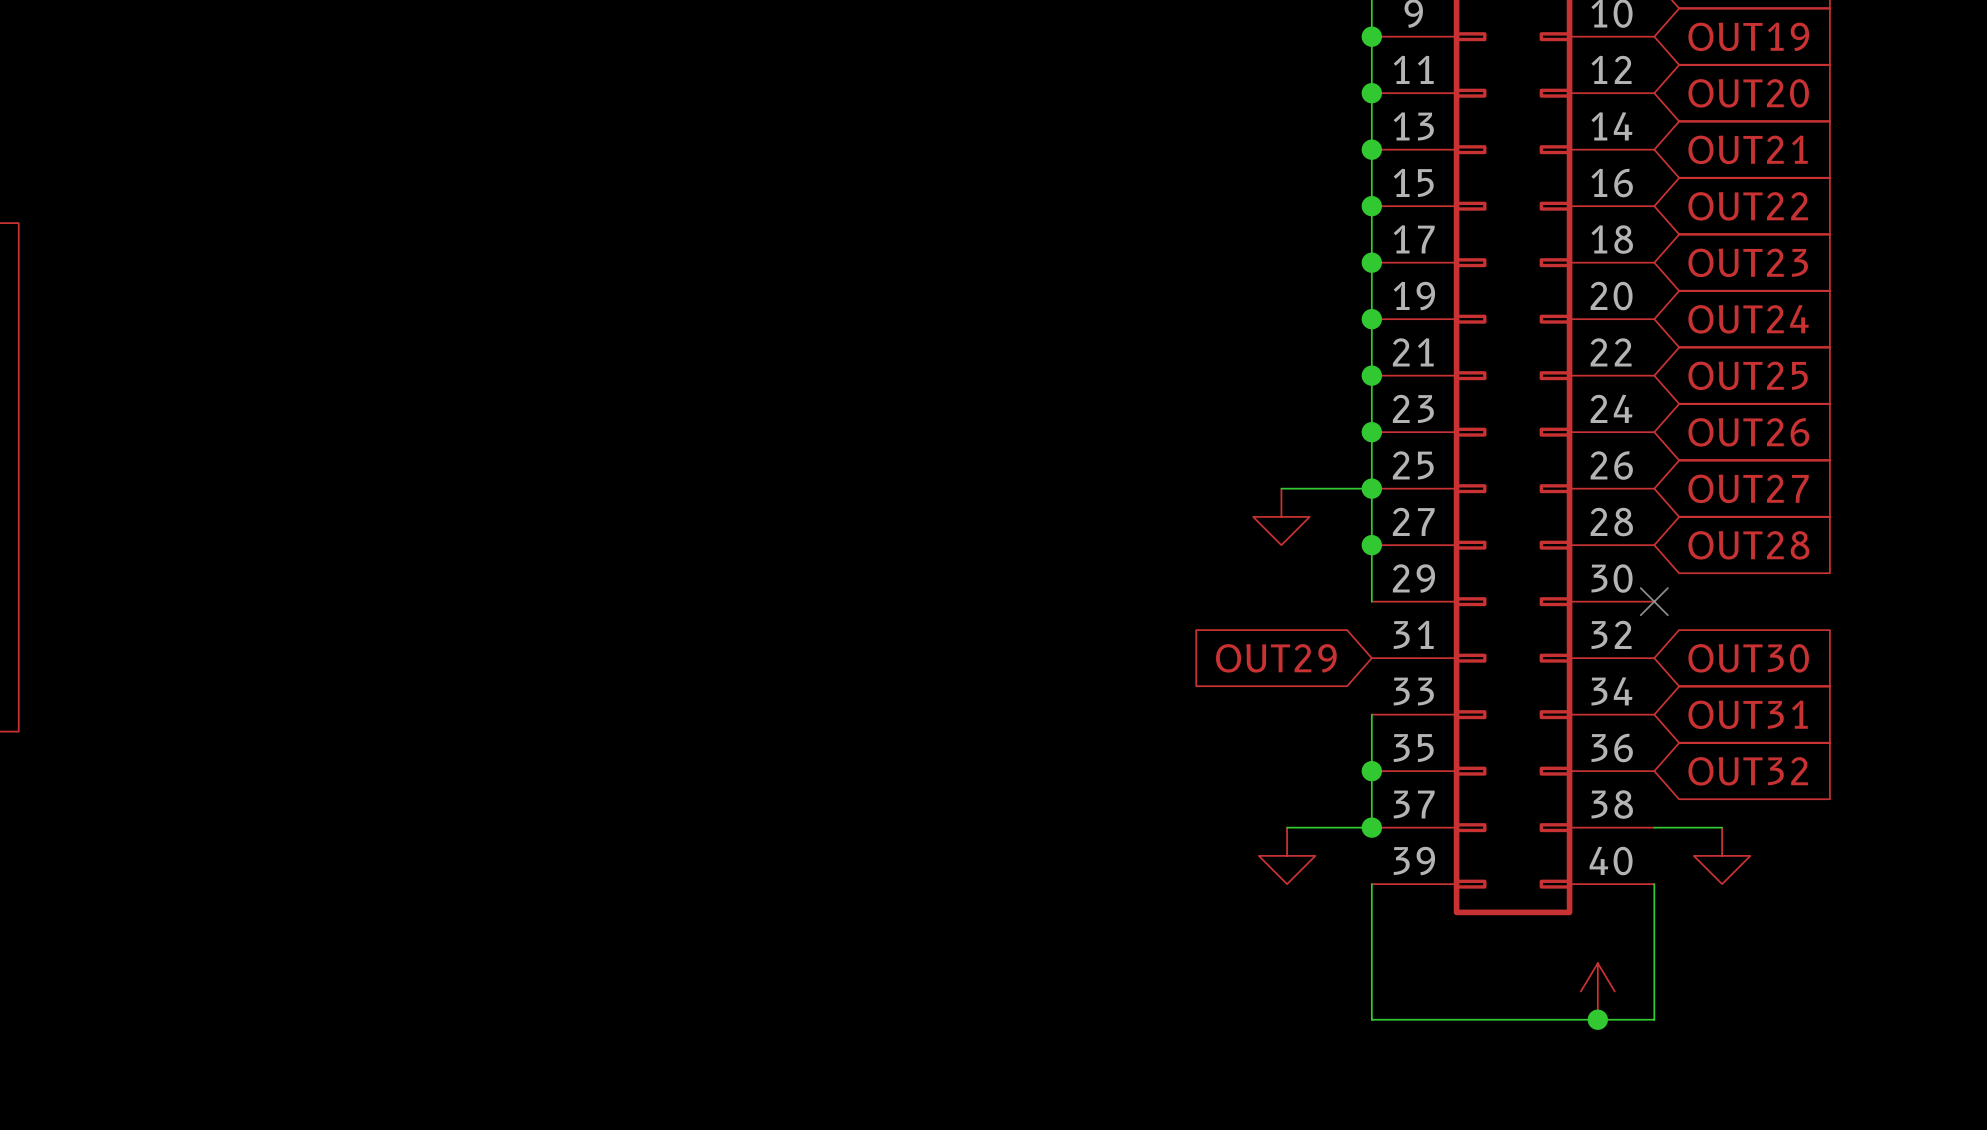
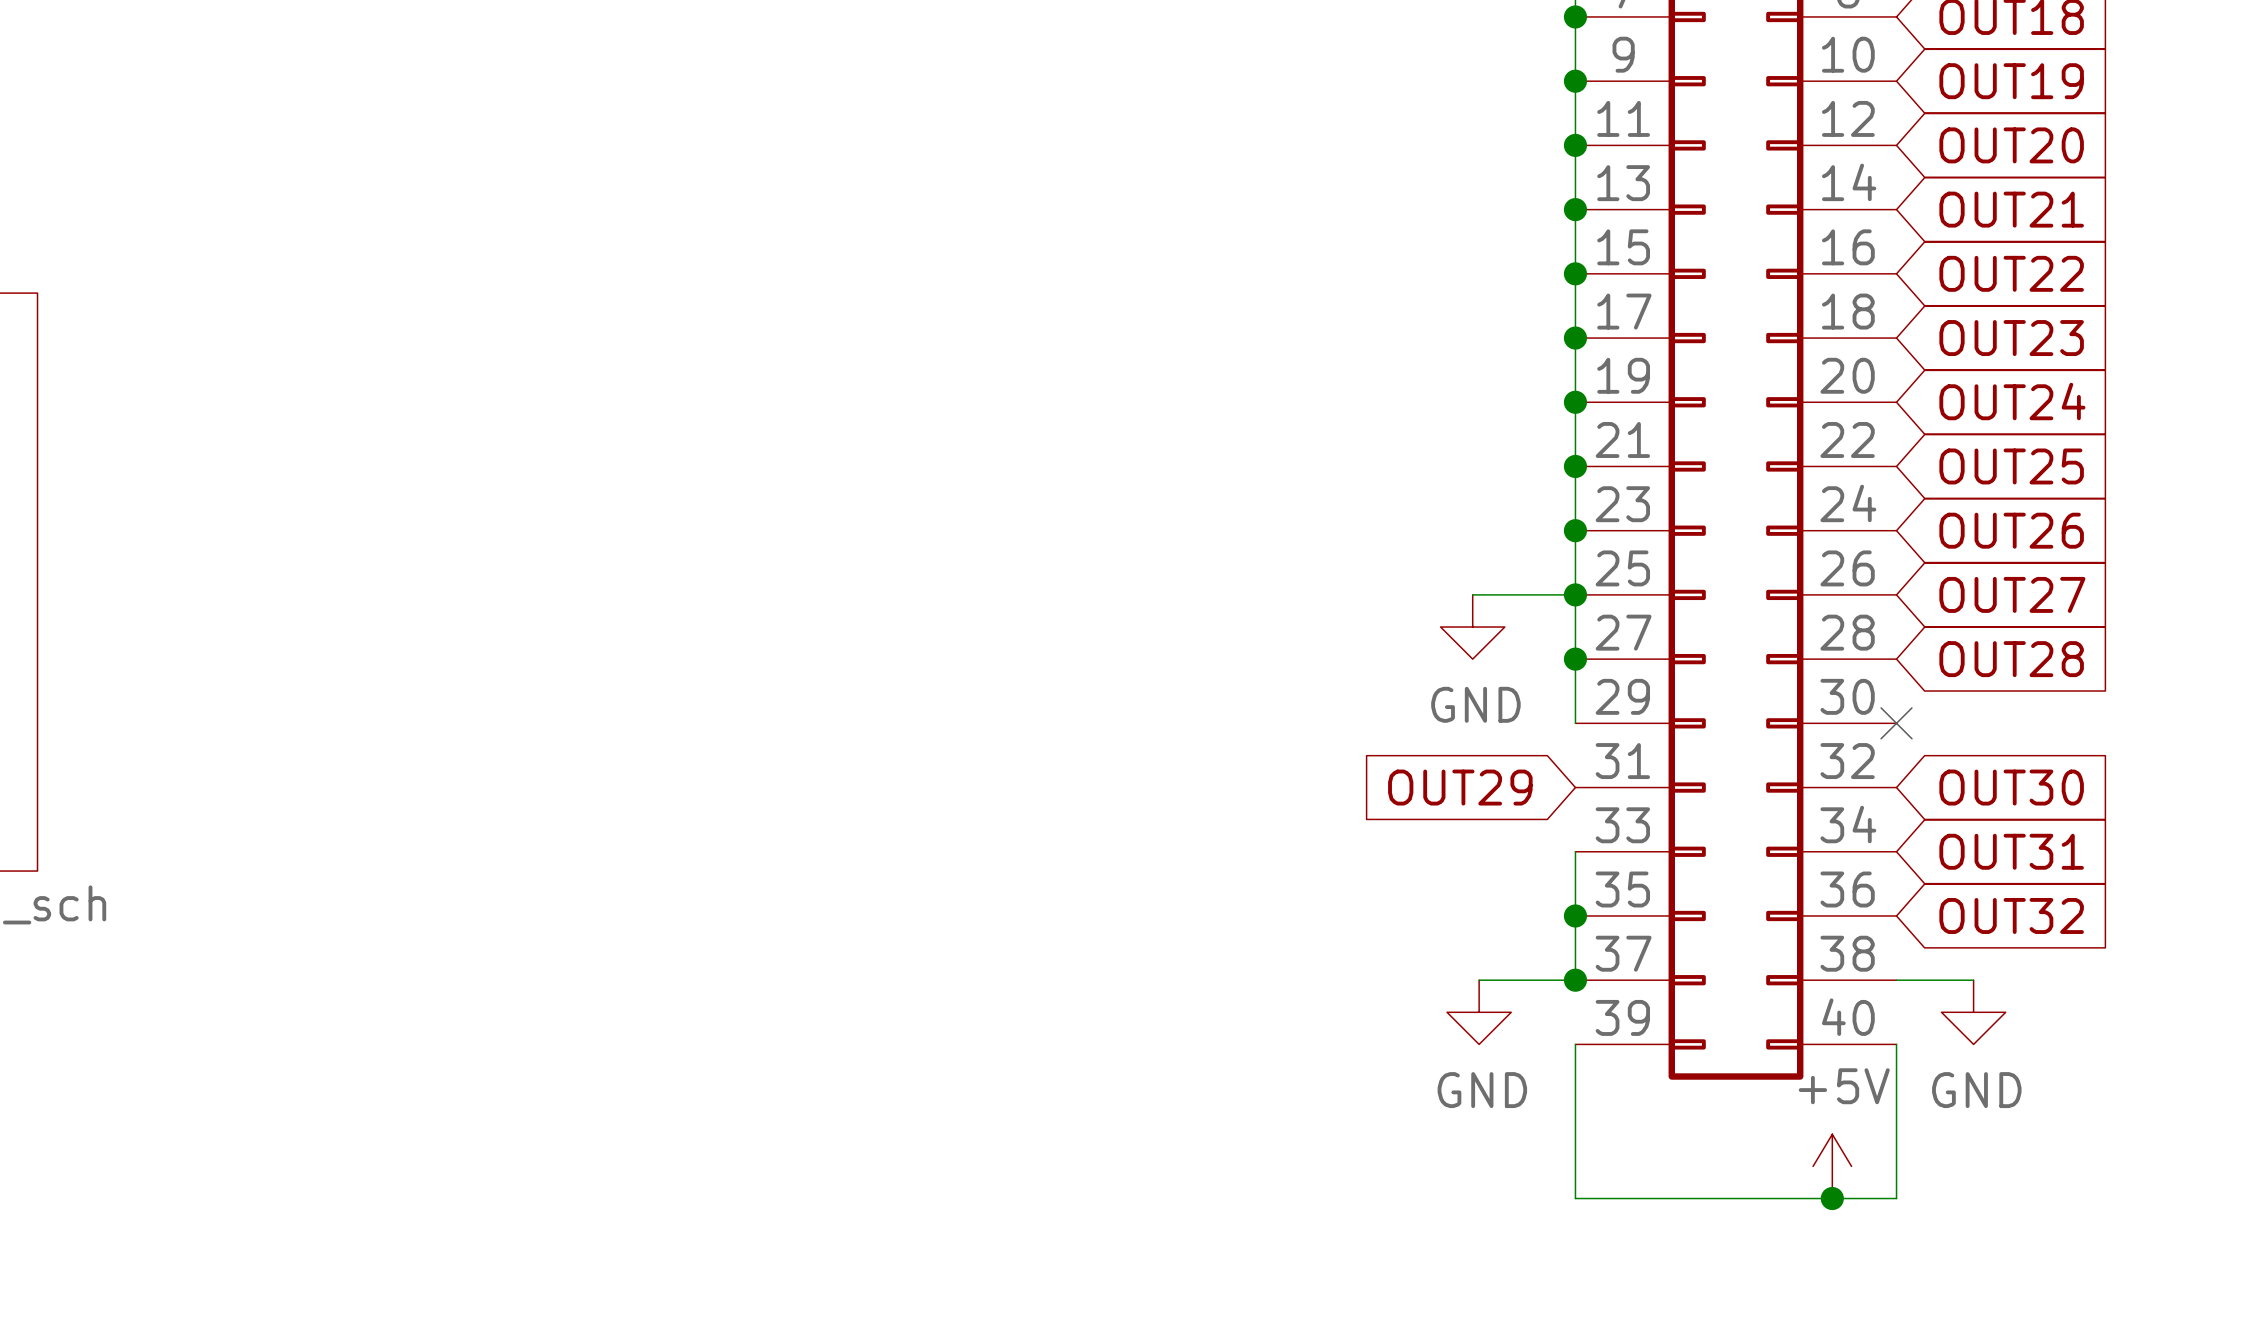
power symbol text: none -> GND (1475, 704)
power symbol text: none -> +5V (1844, 1086)
power symbol text: none -> GND (1482, 1090)
power symbol text: none -> GND (1976, 1090)

